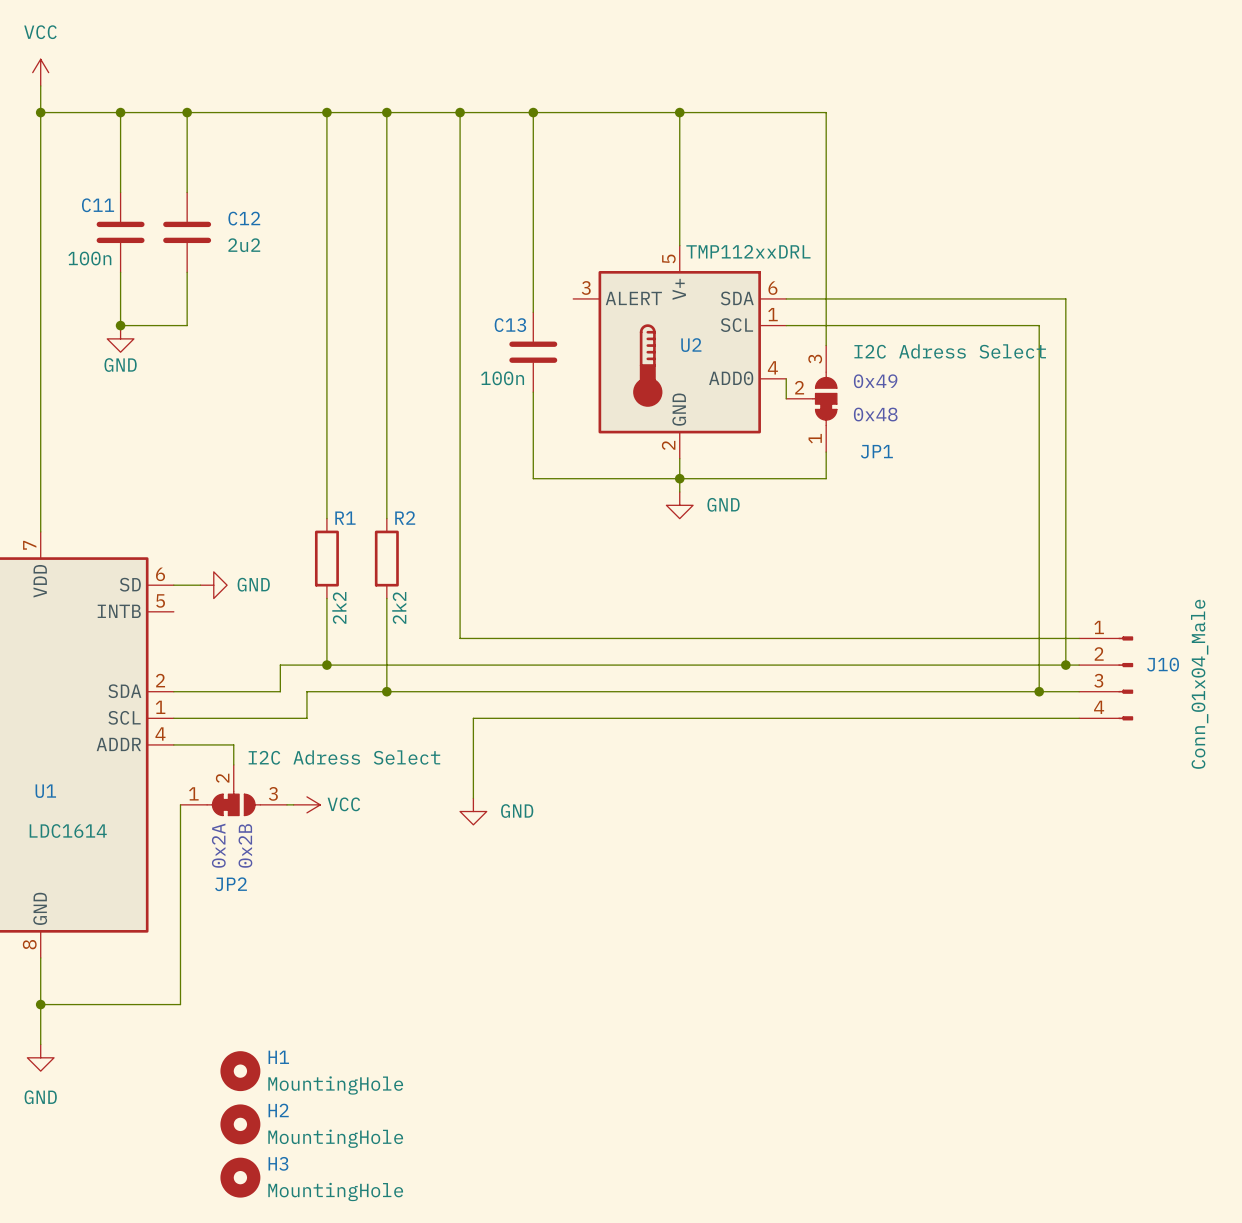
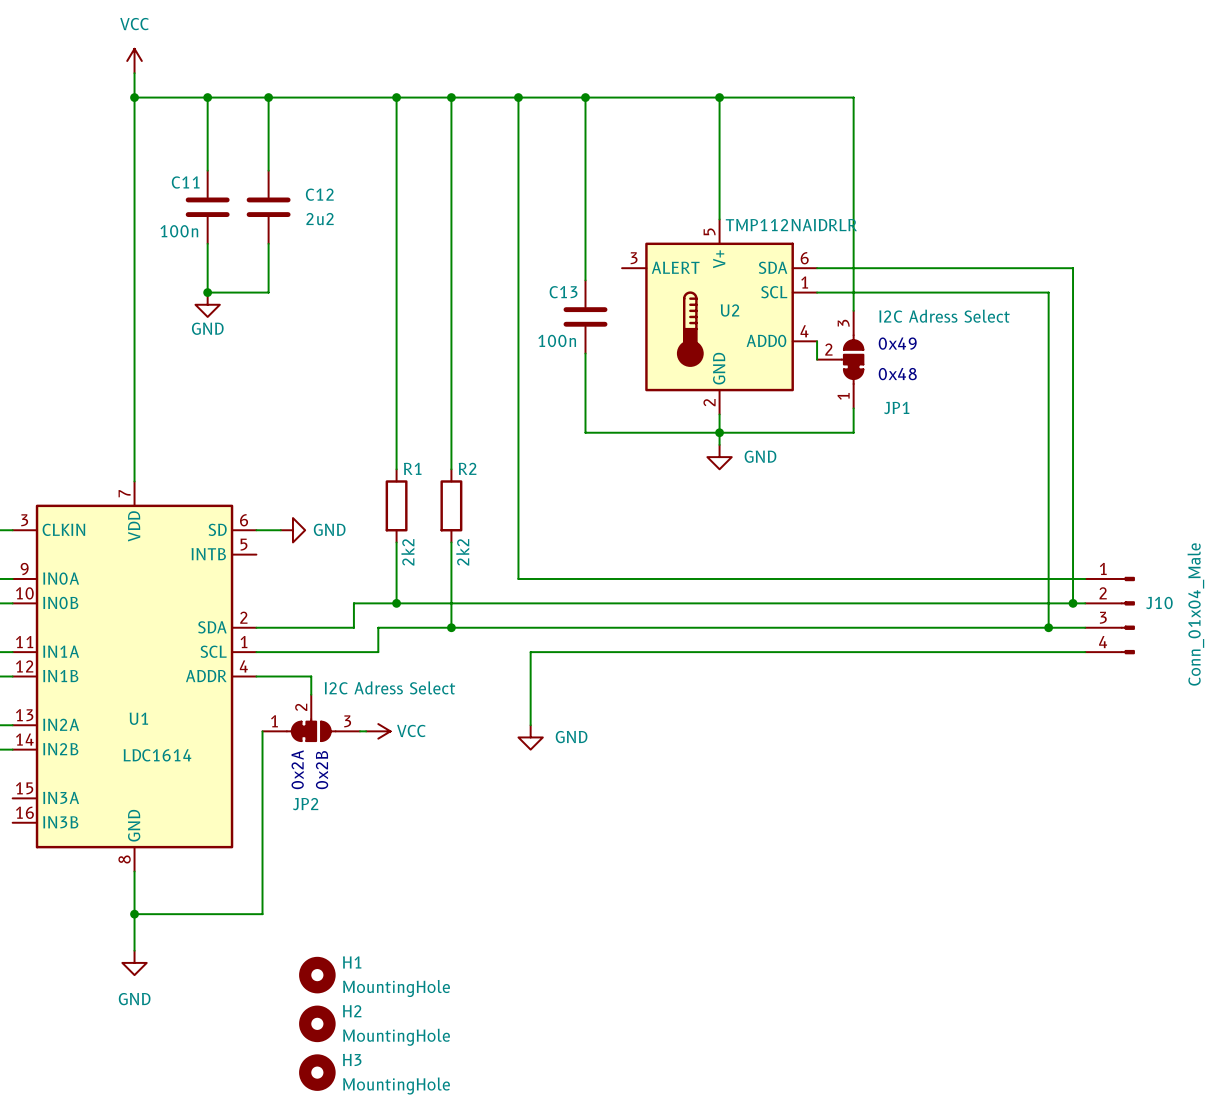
U2 value: TMP112xxDRL (748, 251) -> TMP112NAIDRLR (791, 225)

